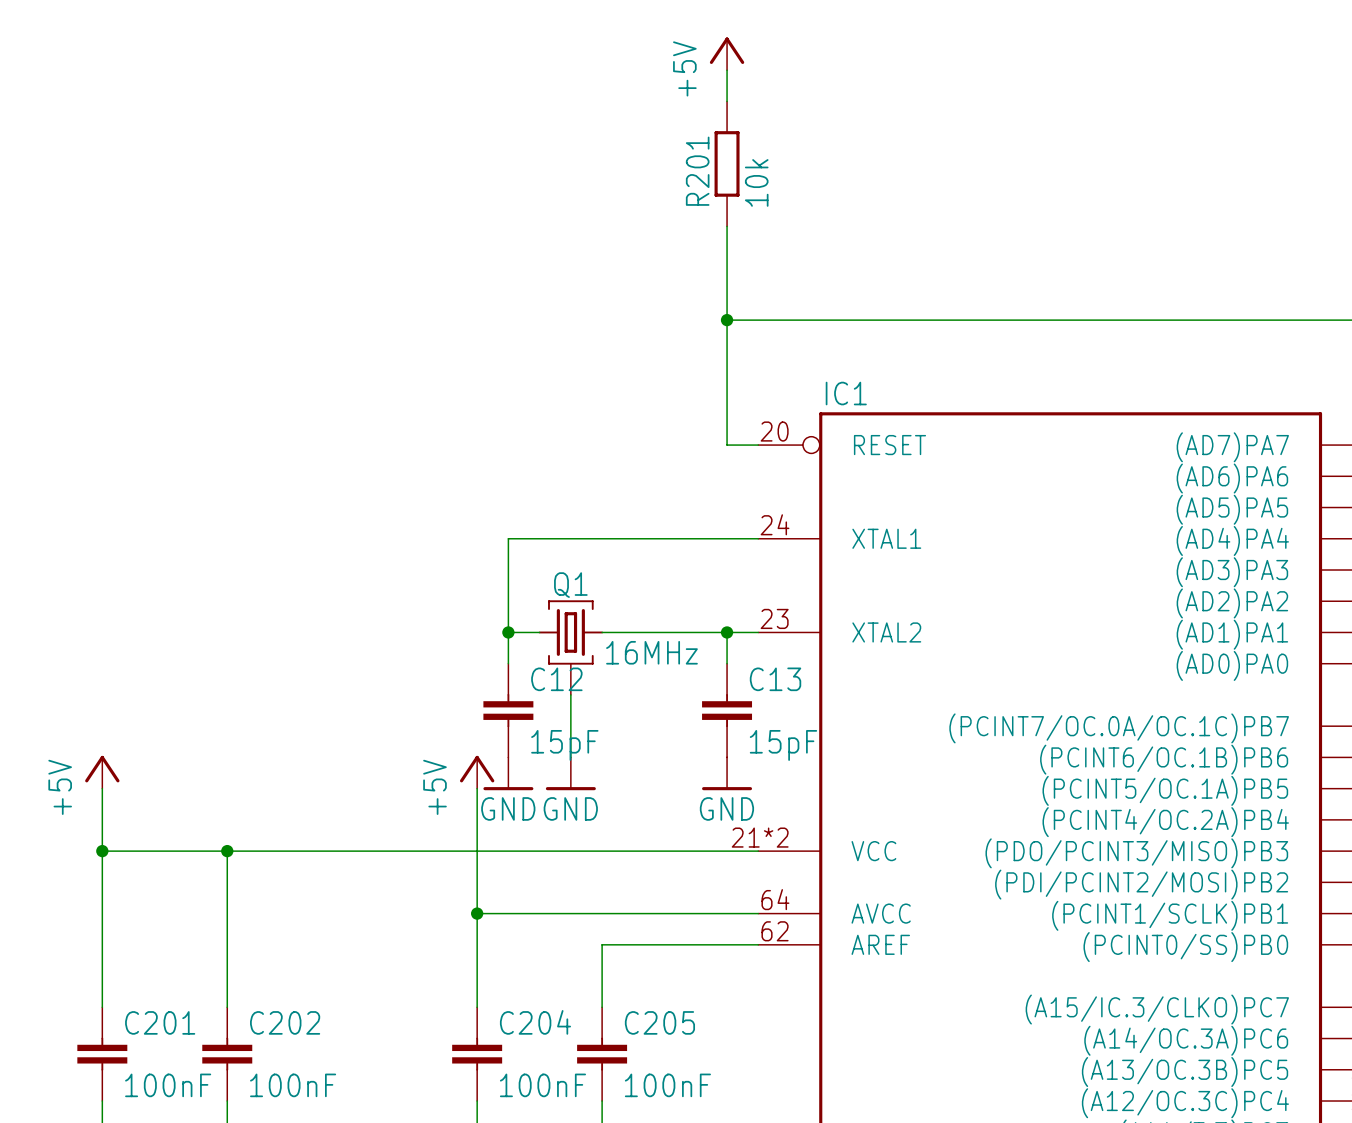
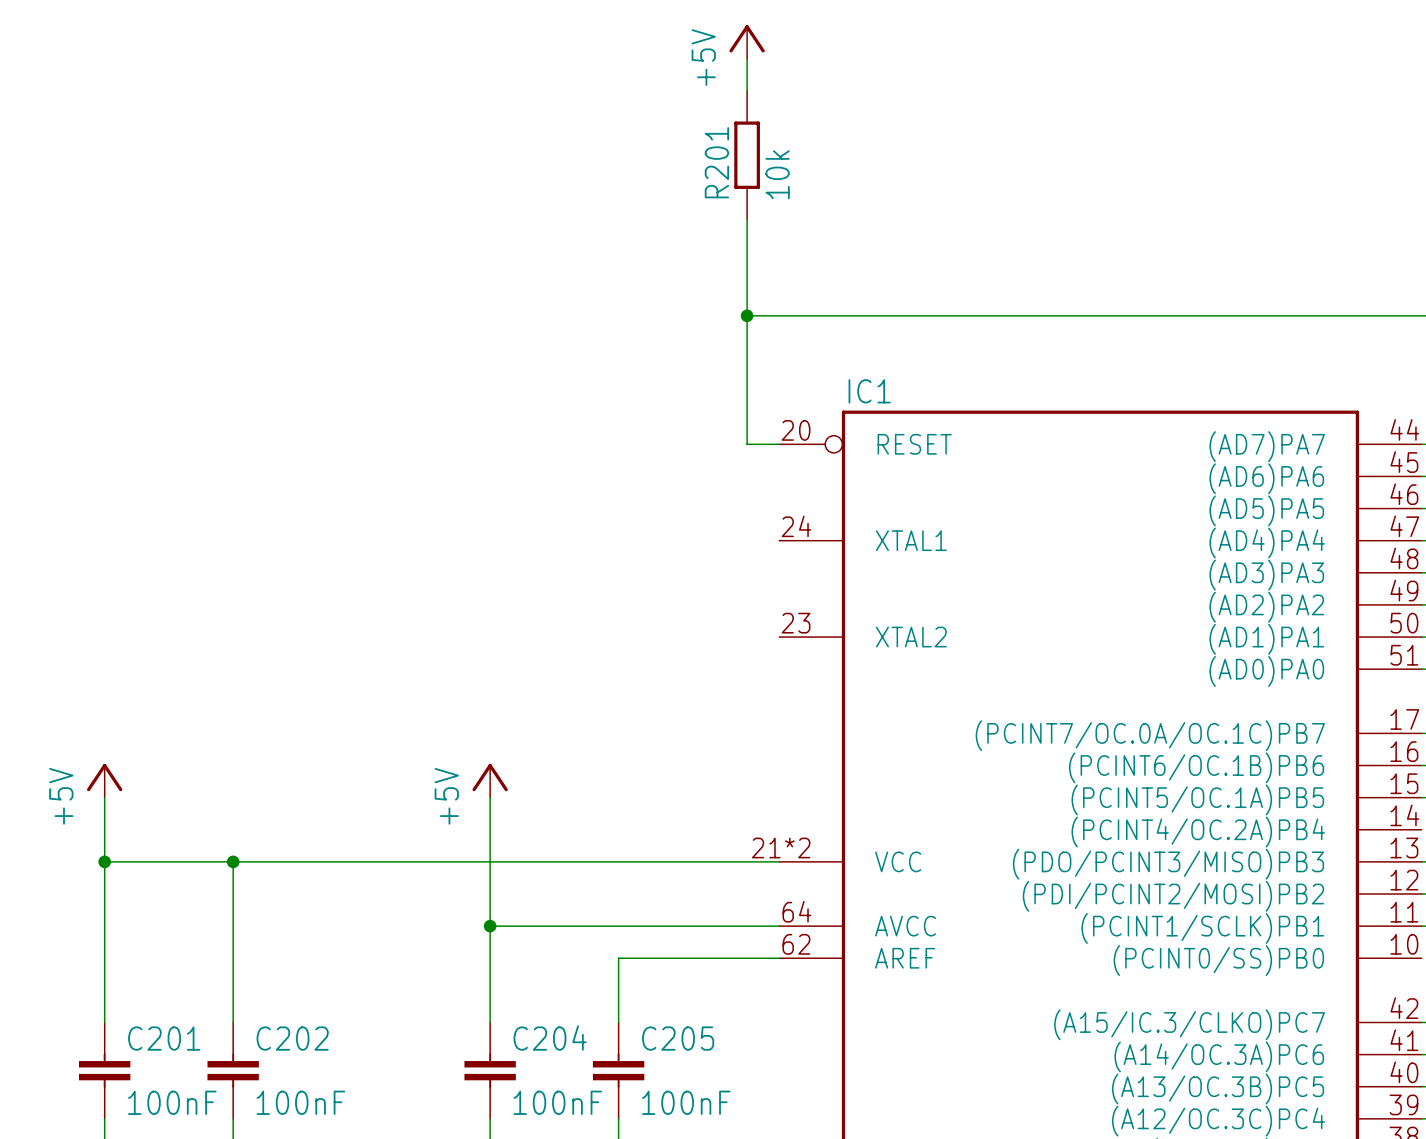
wire: (758, 538) (508, 538) (508, 663) -> none
wire: (508, 632) (539, 632) -> none
junction: (508, 632) -> none
wire: (602, 632) (758, 632) -> none
wire: (727, 632) (727, 663) -> none
junction: (727, 632) -> none
Q1: 16MHz (570, 647) -> none
wire: (570, 694) (570, 757) -> none
C12: 15pF (508, 710) -> none
C13: 15pF (727, 710) -> none
power symbol: GND (508, 773) -> none
power symbol: GND (570, 773) -> none
power symbol: GND (727, 773) -> none

